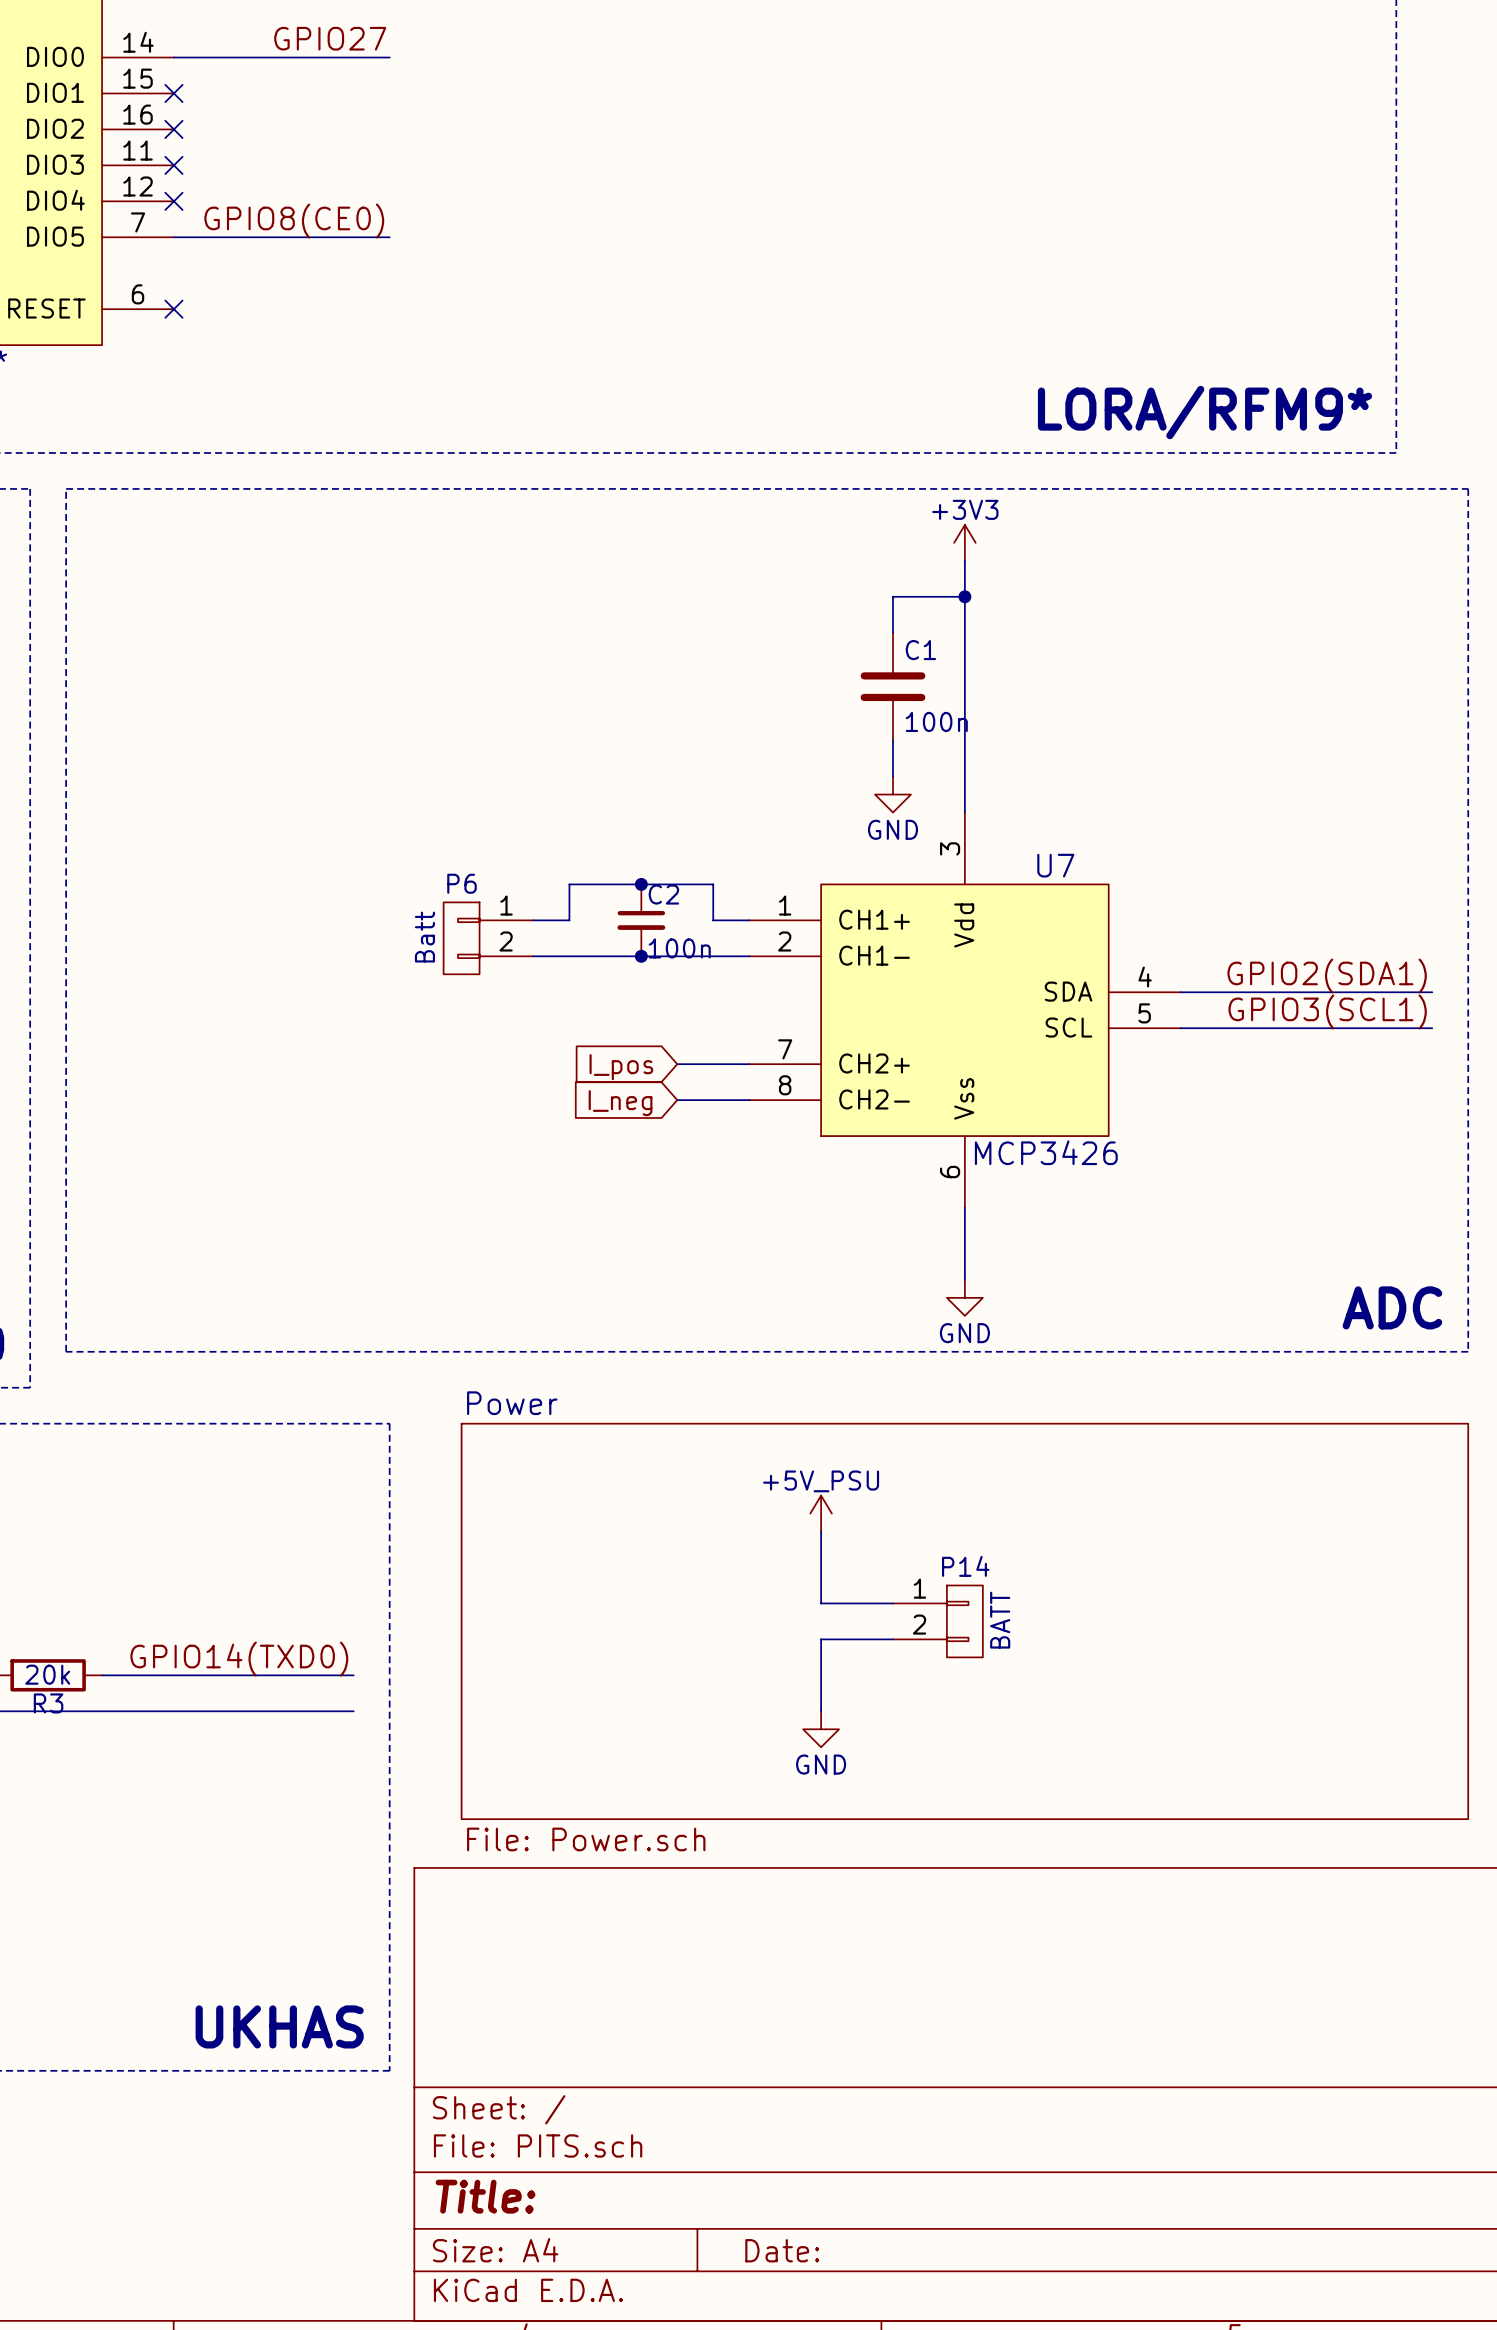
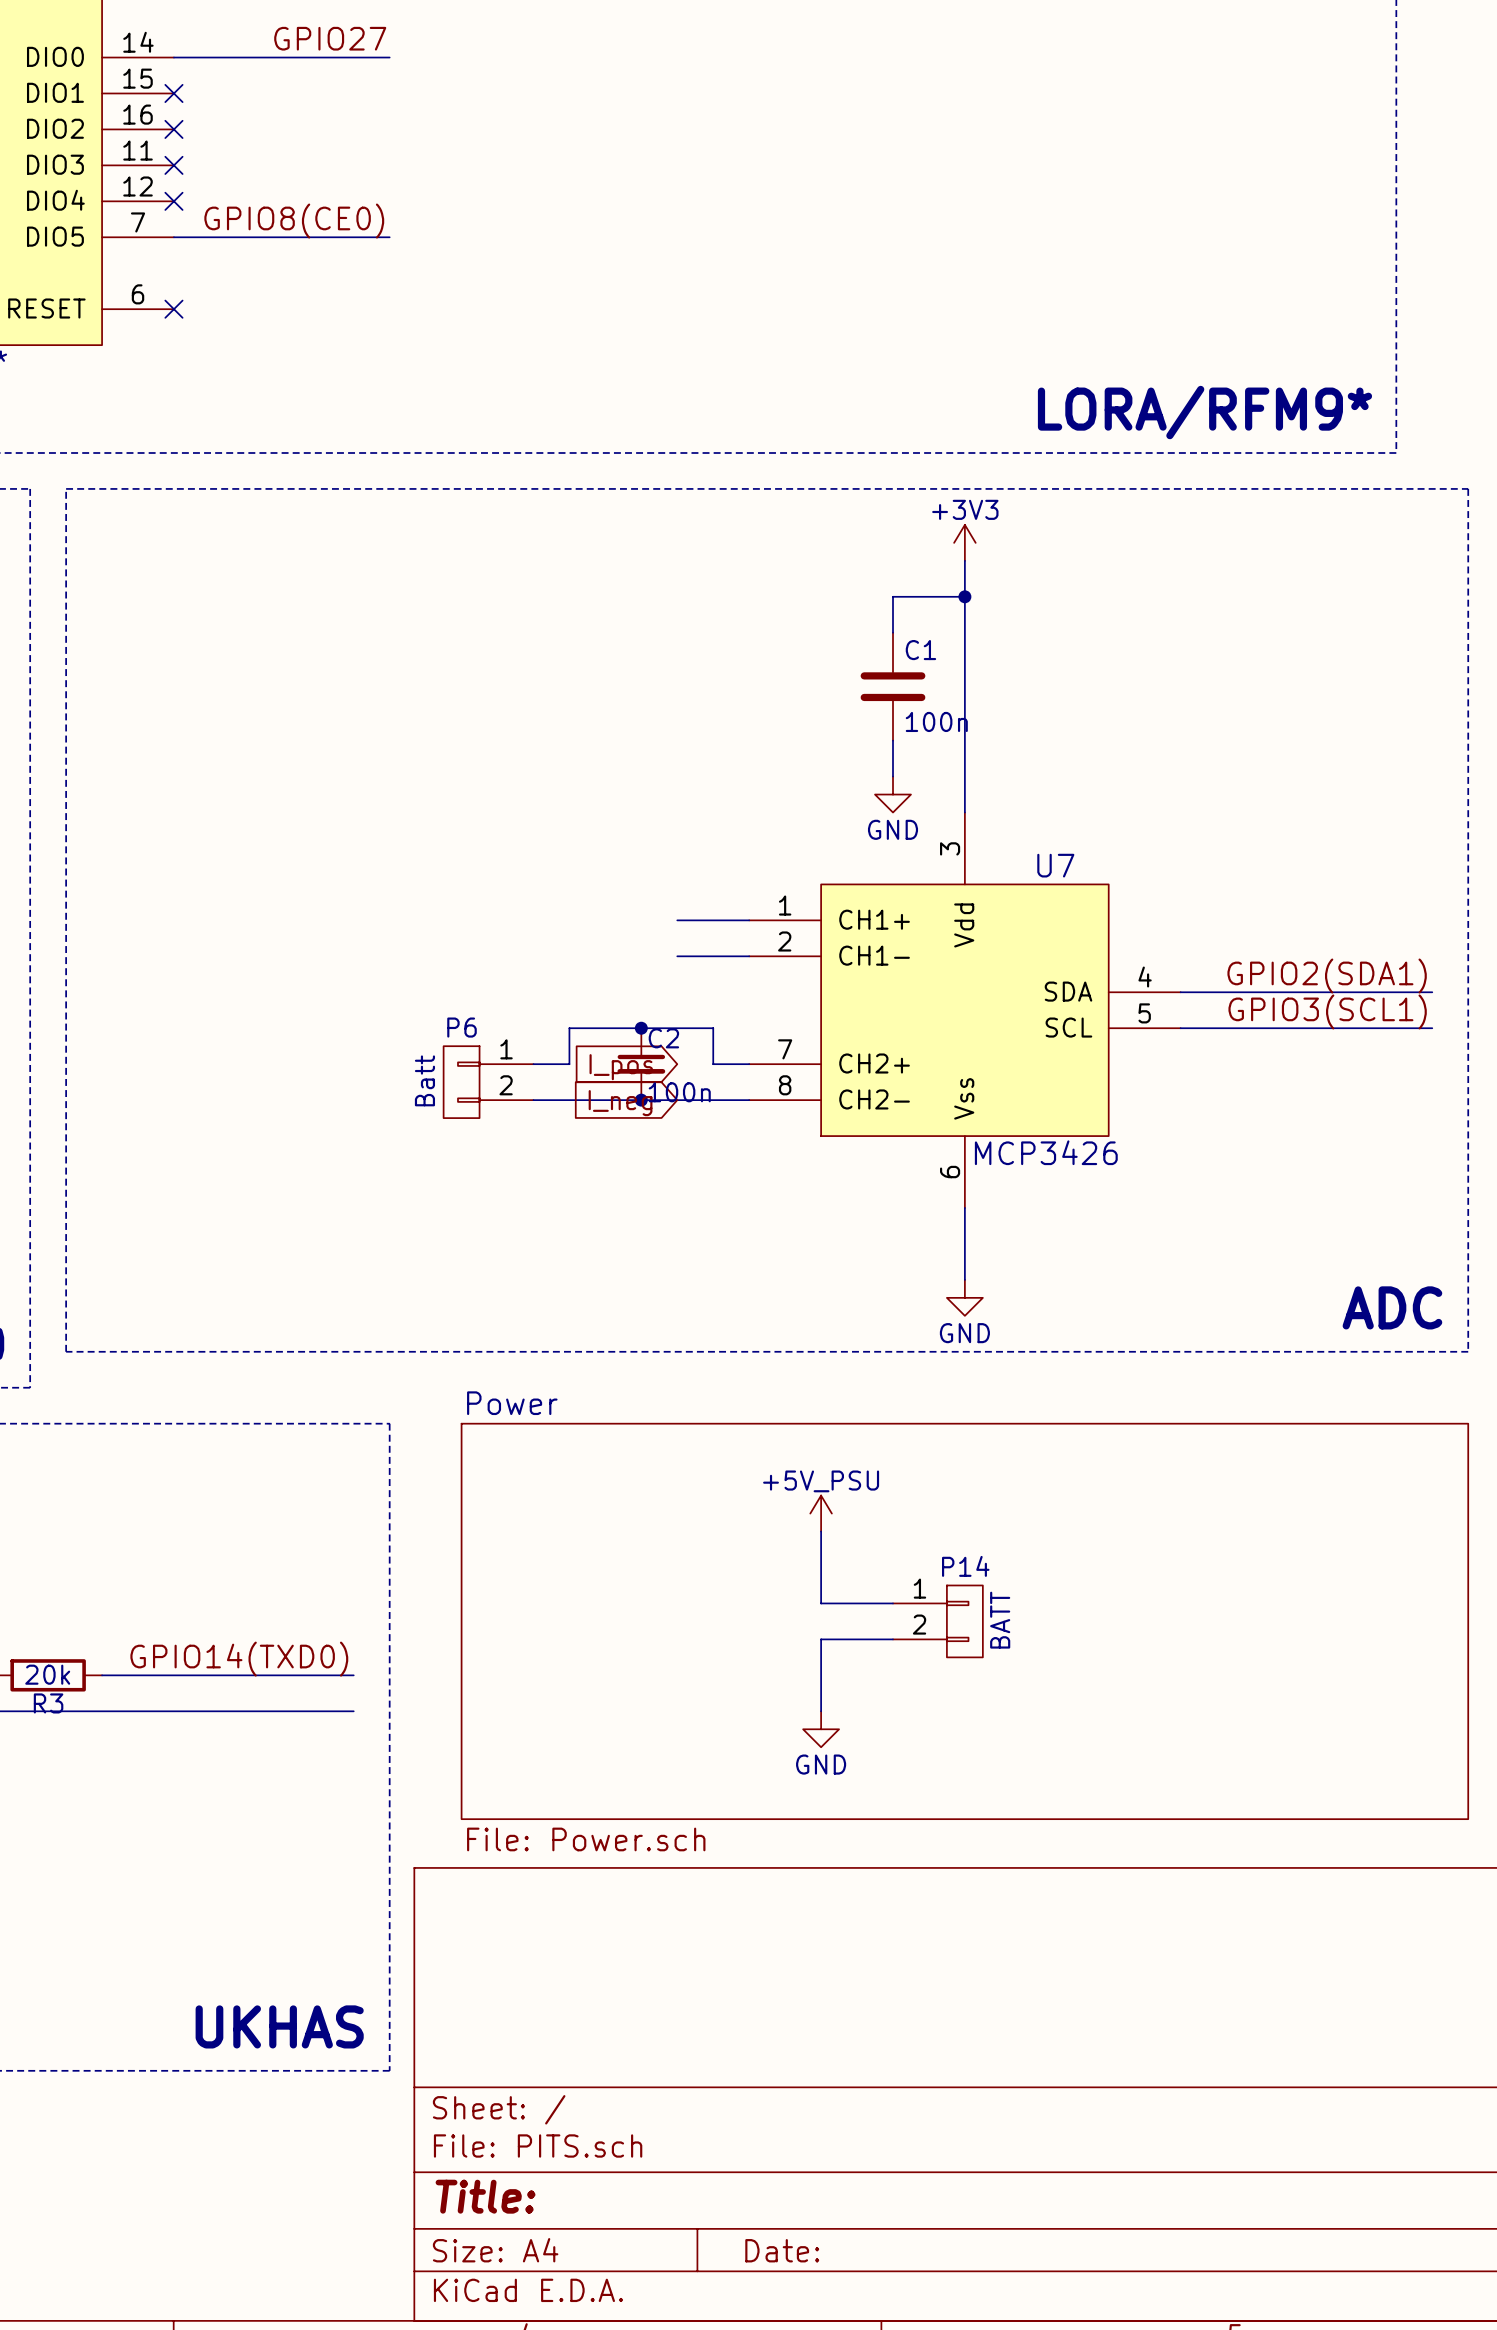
junction: (641, 884) -> none
wire: (533, 920) (569, 920) (569, 884) (713, 884) (713, 920) -> (677, 920) (713, 920)
C2 position: (641, 920) -> (641, 1064)
P6 position: (488, 938) -> (488, 1082)
wire: (533, 956) (677, 956) -> (533, 1100) (677, 1100)
junction: (641, 956) -> none
junction: none -> (641, 1028)
wire: (677, 1064) (713, 1064) -> (533, 1064) (569, 1064) (569, 1028) (713, 1028) (713, 1064)
junction: none -> (641, 1100)

